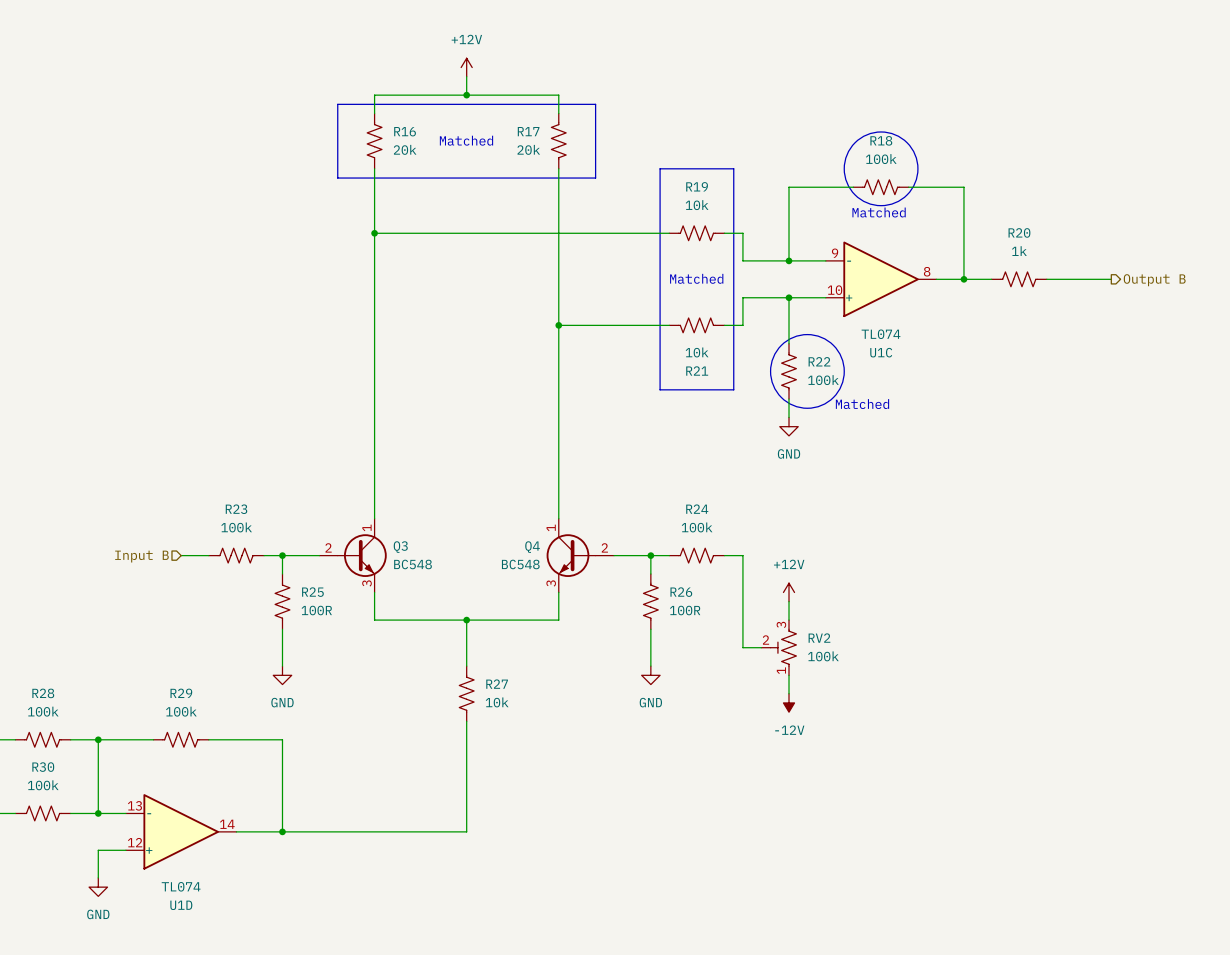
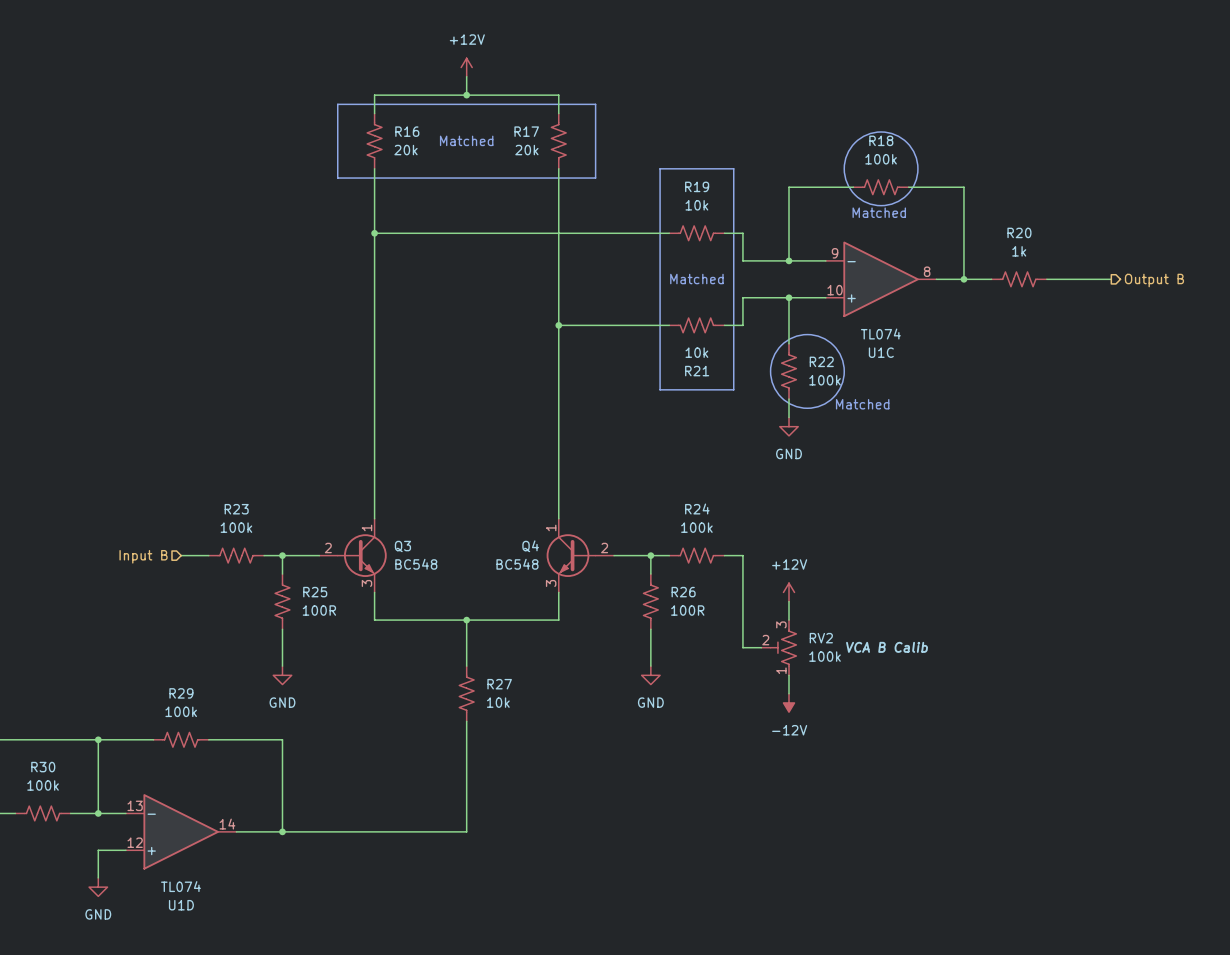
RV2 text: none -> VCA B Calib (887, 647)
R28: 100k (43, 739) -> none

